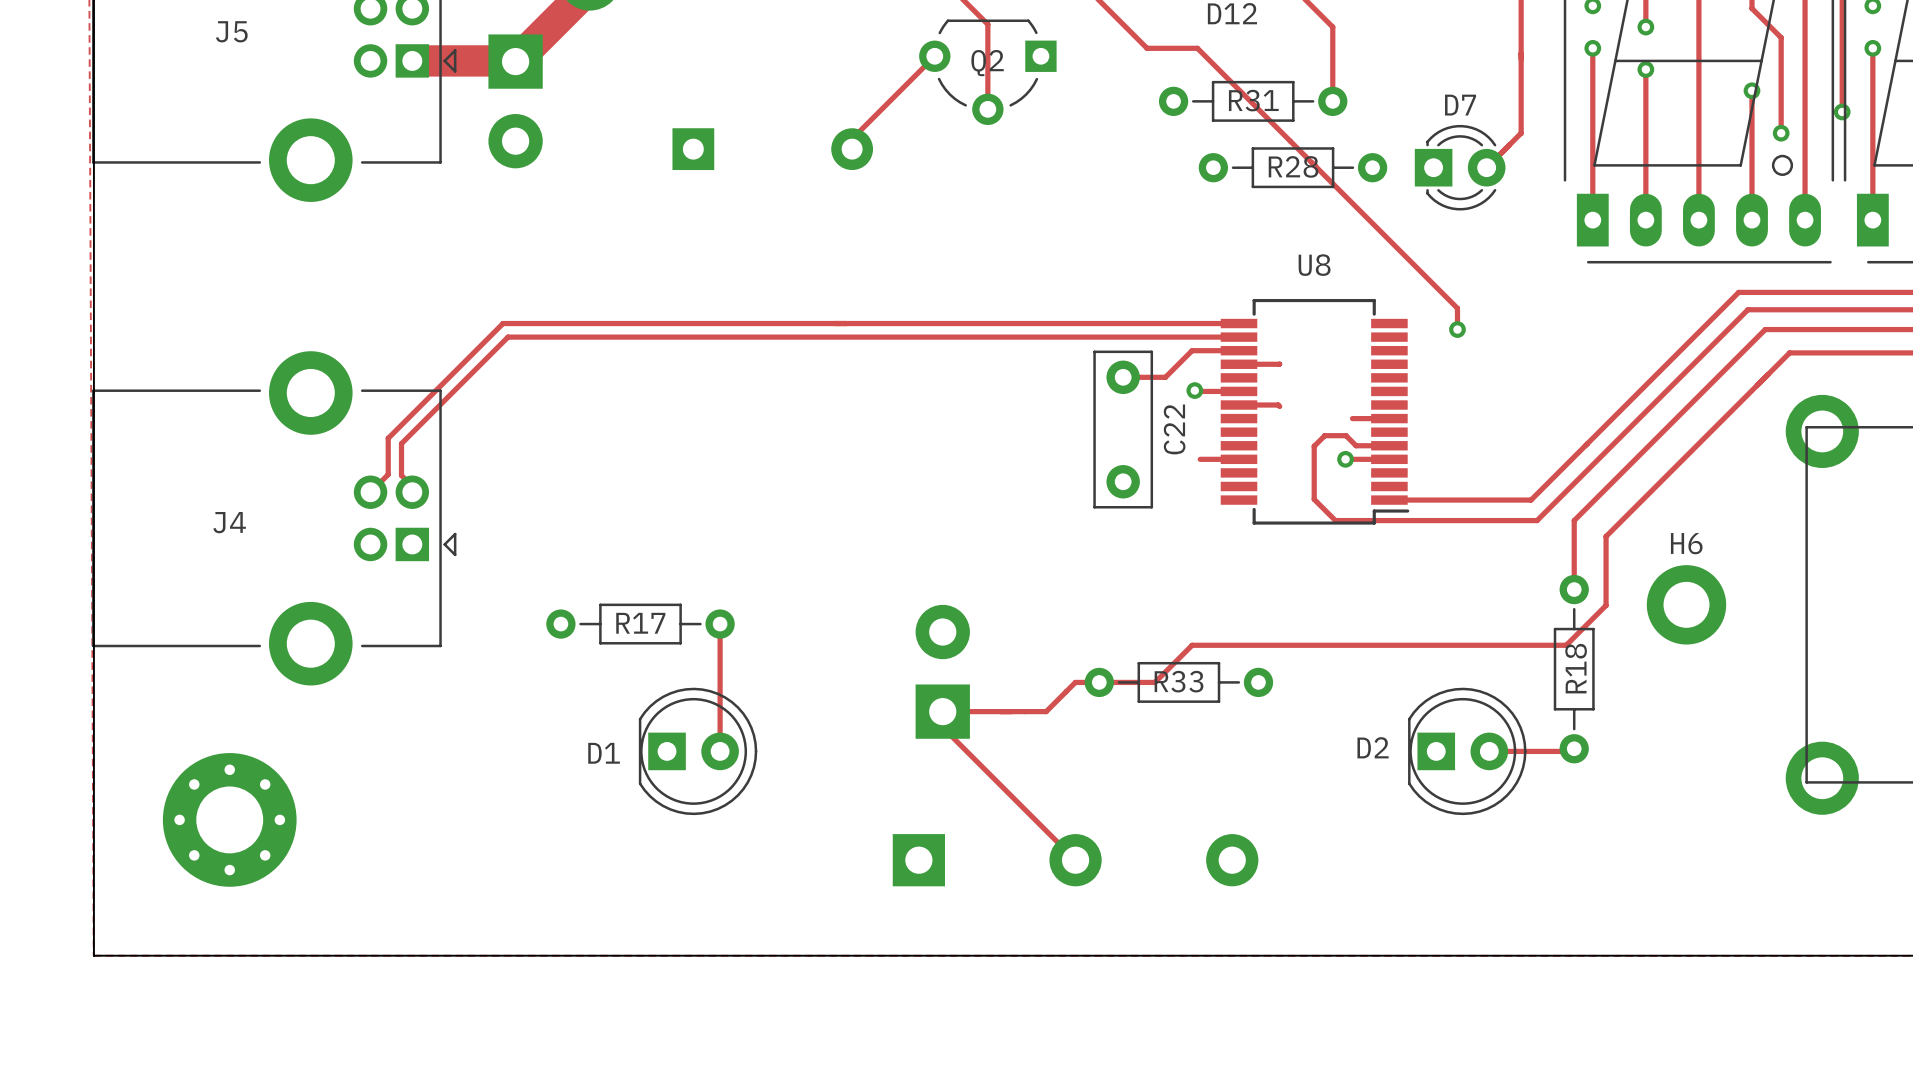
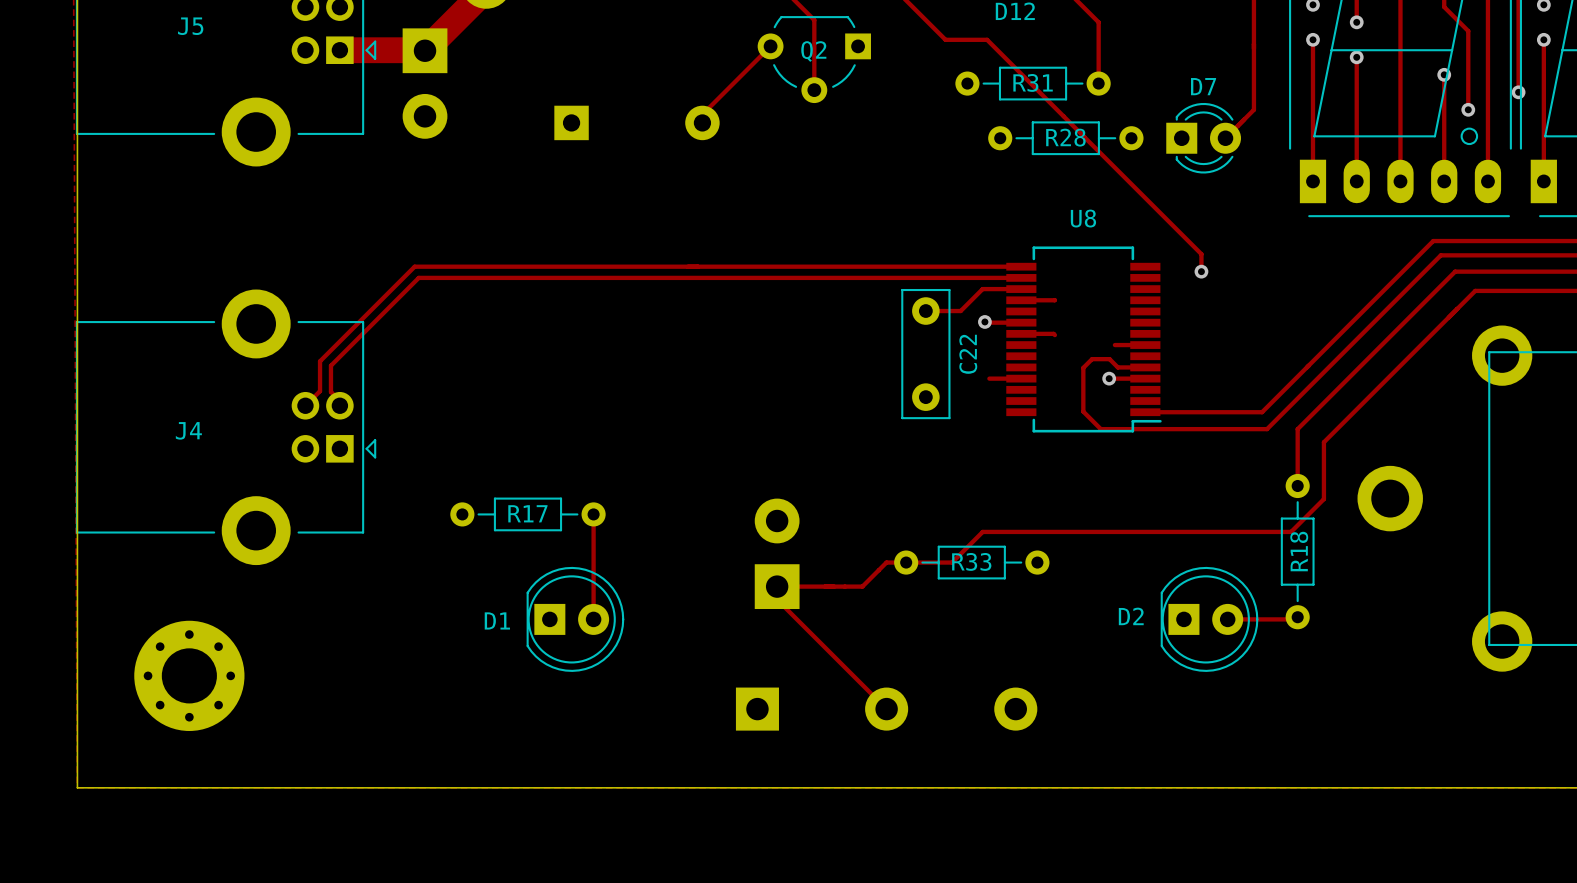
H6 name: H6 (1686, 543) -> none

